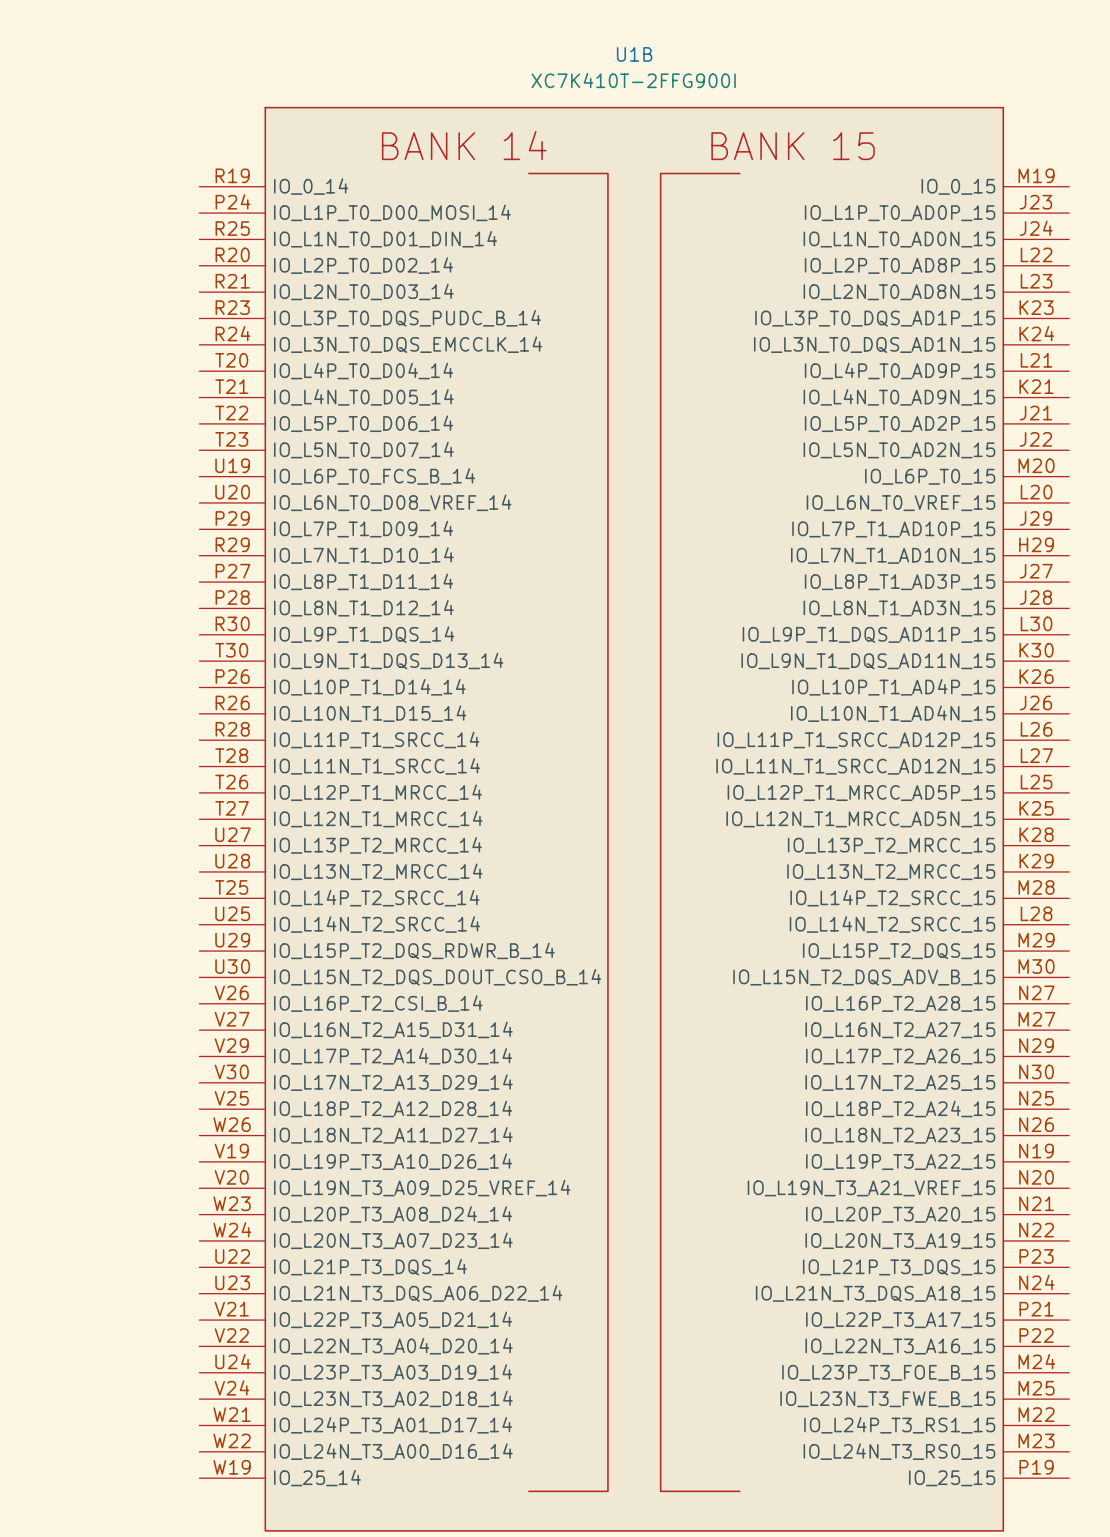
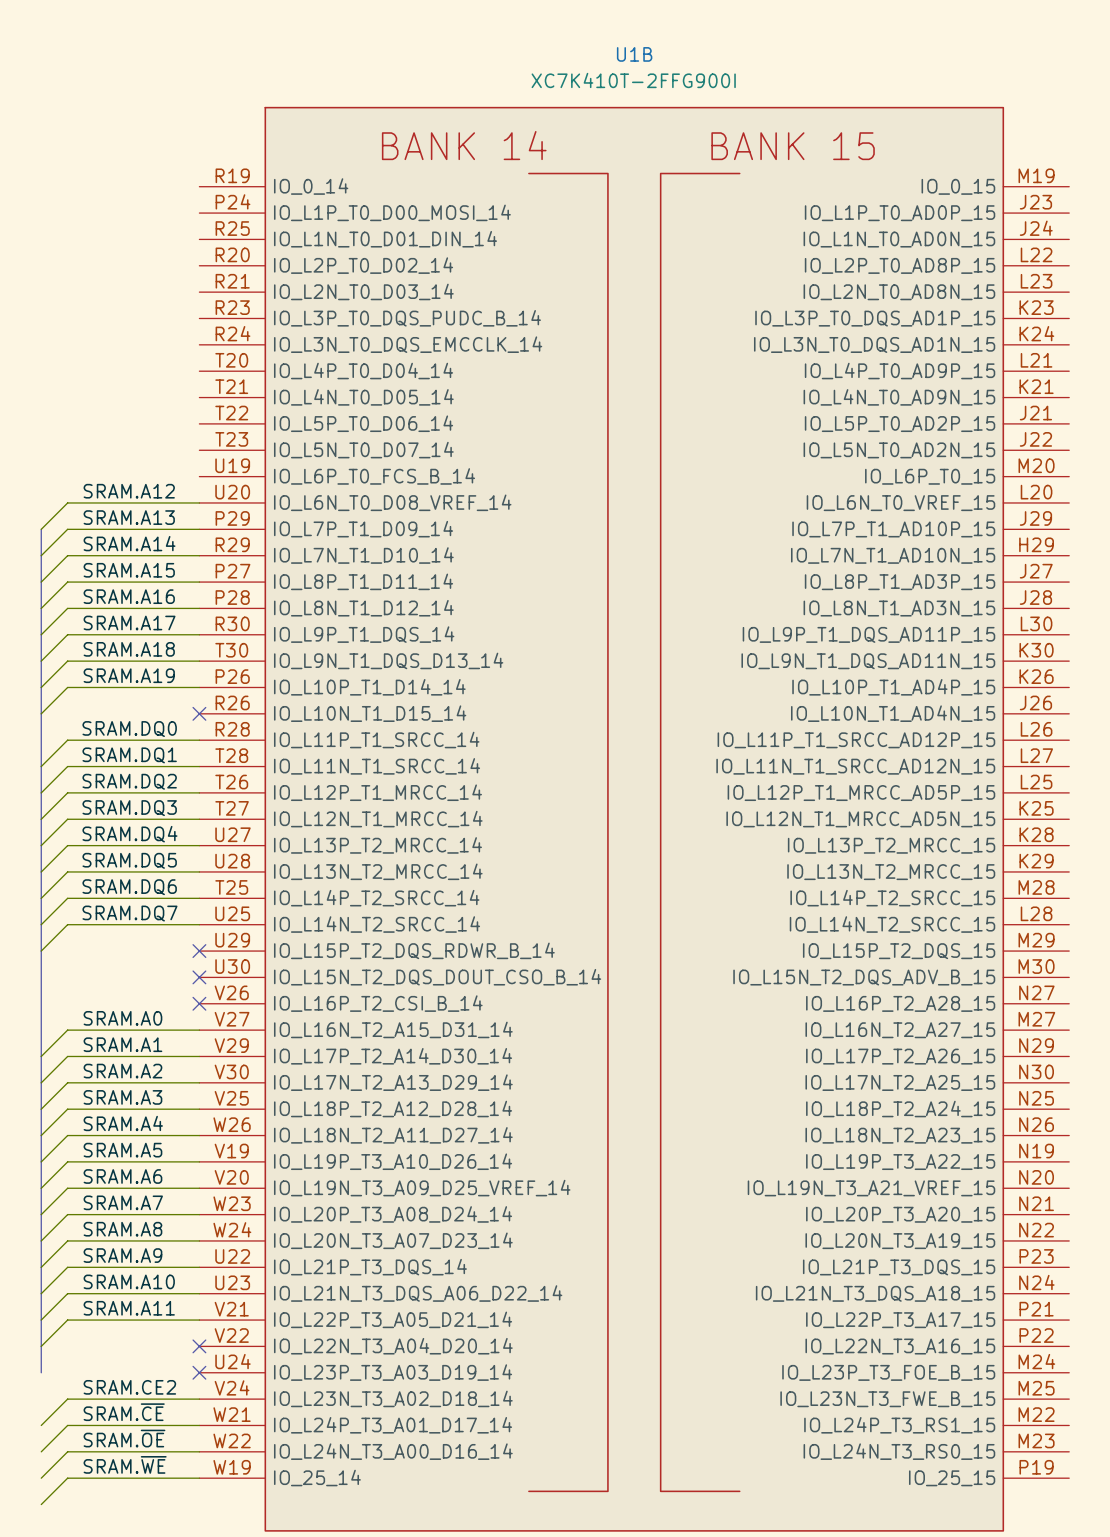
label: none -> SRAM.A12 (129, 491)
wire: none -> (199, 502) (67, 502) (41, 529)
label: none -> SRAM.A13 (129, 517)
bus: none -> (41, 529) (41, 1372)
wire: none -> (199, 529) (67, 529) (41, 555)
label: none -> SRAM.A14 (129, 543)
wire: none -> (199, 555) (67, 555) (41, 582)
label: none -> SRAM.A15 (129, 570)
wire: none -> (199, 582) (67, 582) (41, 608)
label: none -> SRAM.A16 (129, 596)
wire: none -> (199, 608) (67, 608) (41, 634)
label: none -> SRAM.A17 (129, 623)
wire: none -> (199, 634) (67, 634) (41, 661)
label: none -> SRAM.A18 (129, 649)
wire: none -> (199, 661) (67, 661) (41, 687)
label: none -> SRAM.A19 (129, 675)
wire: none -> (199, 687) (67, 687) (41, 713)
no-connect mark: none -> (199, 713)
label: none -> SRAM.DQ0 (129, 729)
wire: none -> (199, 740) (67, 740) (41, 766)
label: none -> SRAM.DQ1 (129, 755)
wire: none -> (199, 766) (67, 766) (41, 792)
label: none -> SRAM.DQ2 (129, 781)
wire: none -> (199, 792) (67, 792) (41, 819)
label: none -> SRAM.DQ3 (129, 808)
wire: none -> (199, 819) (67, 819) (41, 845)
label: none -> SRAM.DQ4 (129, 834)
wire: none -> (199, 845) (67, 845) (41, 871)
label: none -> SRAM.DQ5 (129, 860)
wire: none -> (199, 871) (67, 871) (41, 898)
label: none -> SRAM.DQ6 (129, 887)
wire: none -> (199, 898) (67, 898) (41, 924)
label: none -> SRAM.DQ7 (129, 913)
wire: none -> (199, 924) (67, 924) (41, 951)
no-connect mark: none -> (199, 951)
no-connect mark: none -> (199, 977)
no-connect mark: none -> (199, 1003)
label: none -> SRAM.A0 (122, 1018)
wire: none -> (199, 1030) (67, 1030) (41, 1056)
label: none -> SRAM.A1 (122, 1044)
wire: none -> (199, 1056) (67, 1056) (41, 1082)
label: none -> SRAM.A2 (122, 1071)
wire: none -> (199, 1082) (67, 1082) (41, 1109)
label: none -> SRAM.A3 (122, 1097)
wire: none -> (199, 1109) (67, 1109) (41, 1135)
label: none -> SRAM.A4 (123, 1123)
wire: none -> (199, 1135) (67, 1135) (41, 1161)
label: none -> SRAM.A5 (122, 1150)
wire: none -> (199, 1161) (67, 1161) (41, 1188)
label: none -> SRAM.A6 (122, 1176)
wire: none -> (199, 1188) (67, 1188) (41, 1214)
label: none -> SRAM.A7 (123, 1202)
wire: none -> (199, 1214) (67, 1214) (41, 1240)
label: none -> SRAM.A8 (122, 1229)
wire: none -> (199, 1240) (67, 1240) (41, 1267)
label: none -> SRAM.A9 (122, 1255)
wire: none -> (199, 1267) (67, 1267) (41, 1293)
label: none -> SRAM.A10 (129, 1281)
wire: none -> (199, 1293) (67, 1293) (41, 1320)
label: none -> SRAM.A11 (129, 1308)
wire: none -> (199, 1320) (67, 1320) (41, 1346)
no-connect mark: none -> (199, 1346)
no-connect mark: none -> (199, 1372)
label: none -> SRAM.CE2 (129, 1387)
wire: none -> (199, 1399) (67, 1399) (41, 1425)
label: none -> SRAM.~{CE} (124, 1412)
wire: none -> (199, 1425) (67, 1425) (41, 1451)
label: none -> SRAM.~{OE} (124, 1438)
wire: none -> (199, 1451) (67, 1451) (41, 1478)
label: none -> SRAM.~{WE} (125, 1464)
wire: none -> (199, 1478) (67, 1478) (41, 1504)

